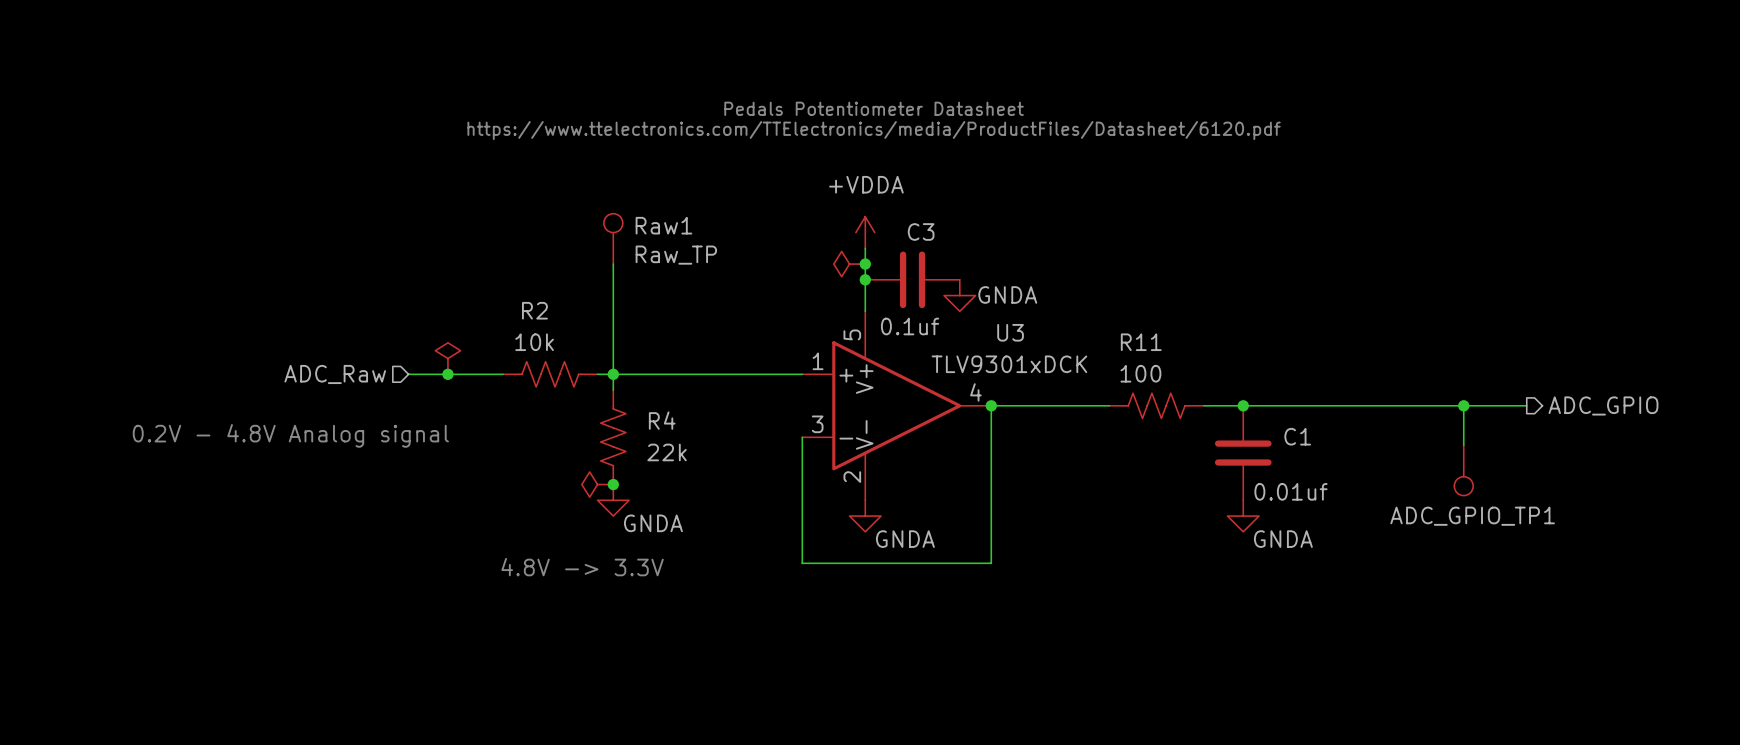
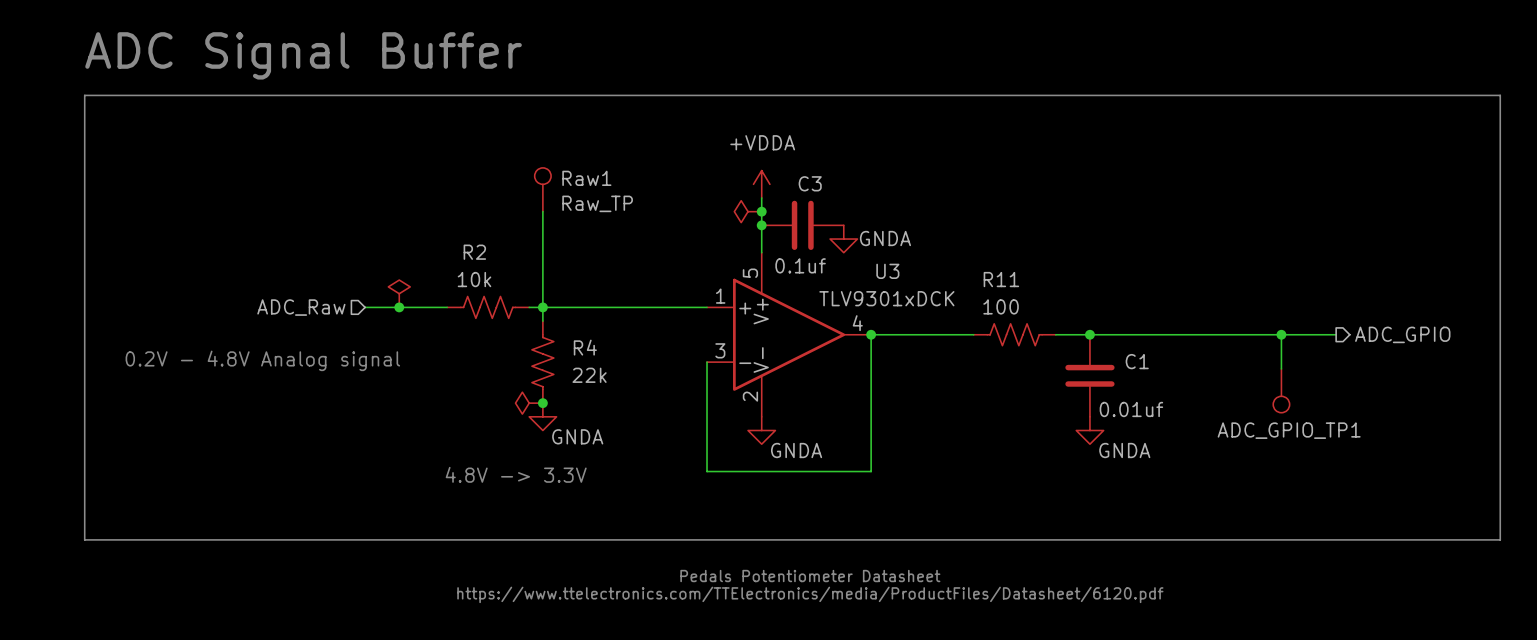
text: none -> ADC Signal Buffer (303, 55)
text: Pedals Potentiometer Datasheet (874, 108) -> none
line: none -> (84, 95) (1500, 95) (1500, 539) (84, 539) (84, 95)
text: https://www.ttelectronics.com/TTElectronics/media/ProductFiles/Datasheet/6120.pdf (874, 130) -> none
text: none -> Pedals Potentiometer Datasheet (810, 576)
text: none -> https://www.ttelectronics.com/TTElectronics/media/ProductFiles/Datasheet/6120.pdf (810, 594)

